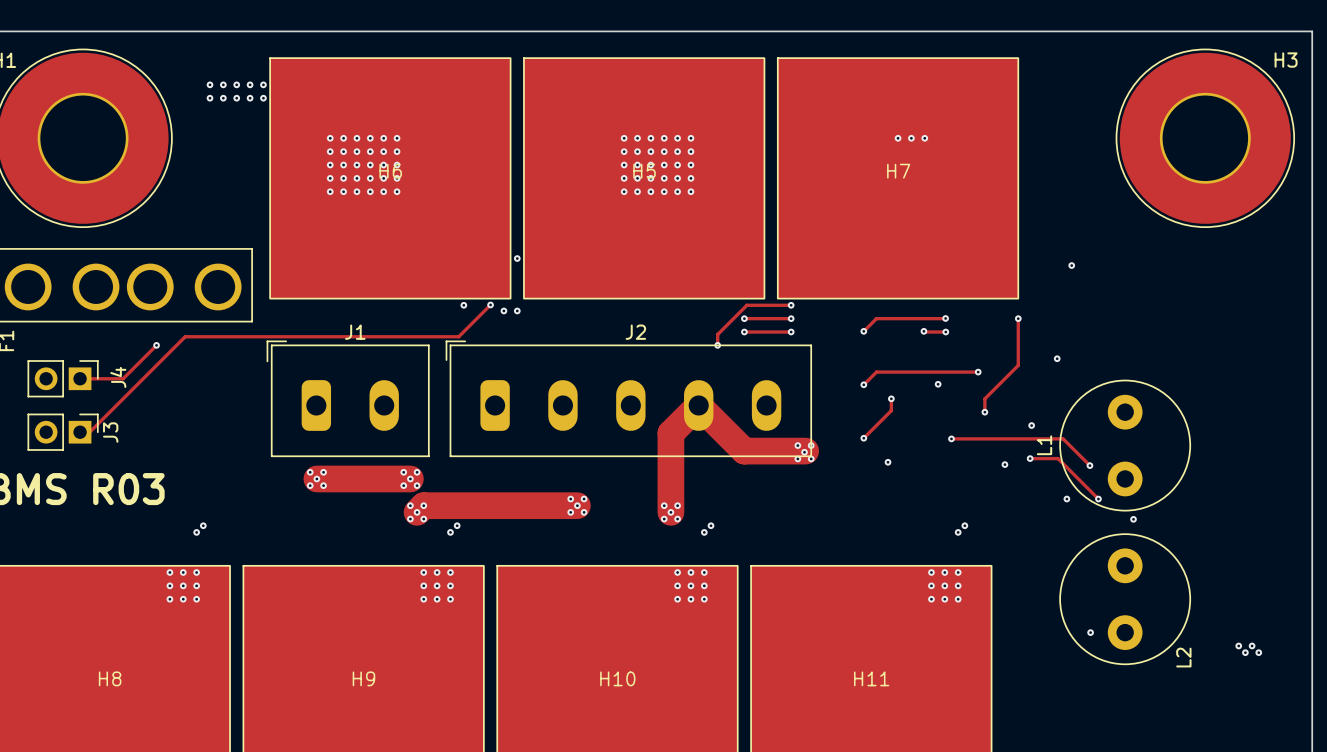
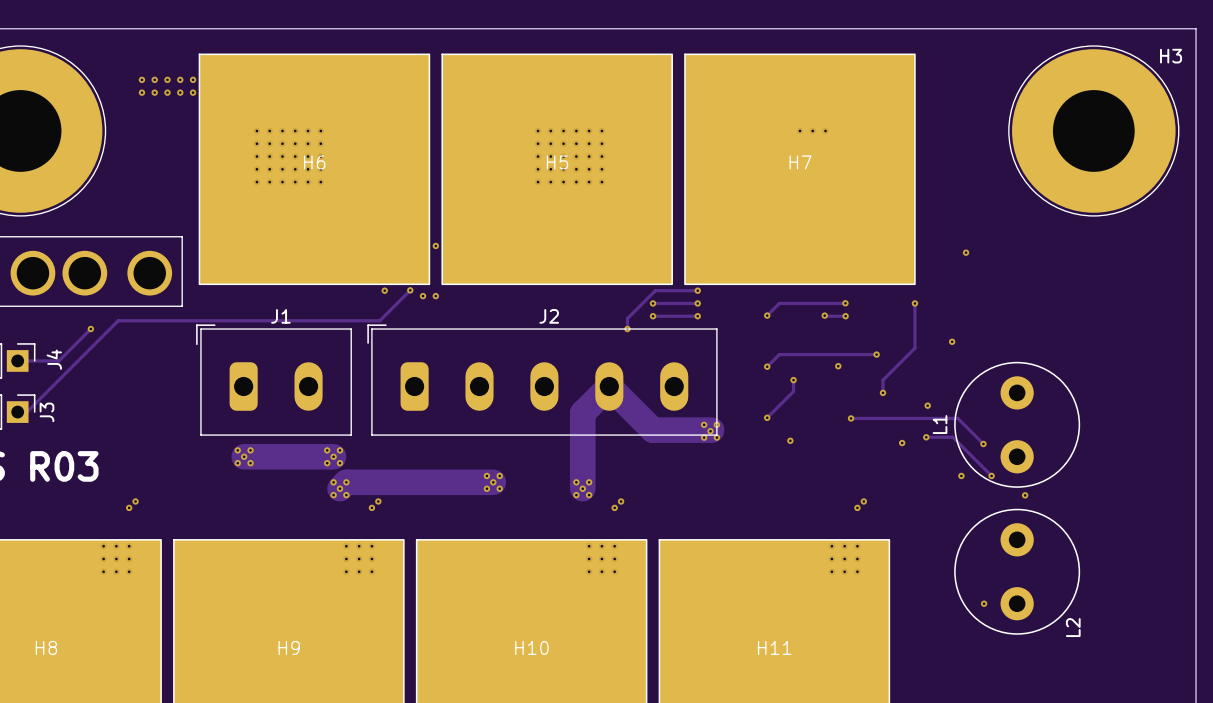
via: (1238, 645) -> none
via: (1252, 645) -> none
via: (1245, 652) -> none
via: (1258, 652) -> none

